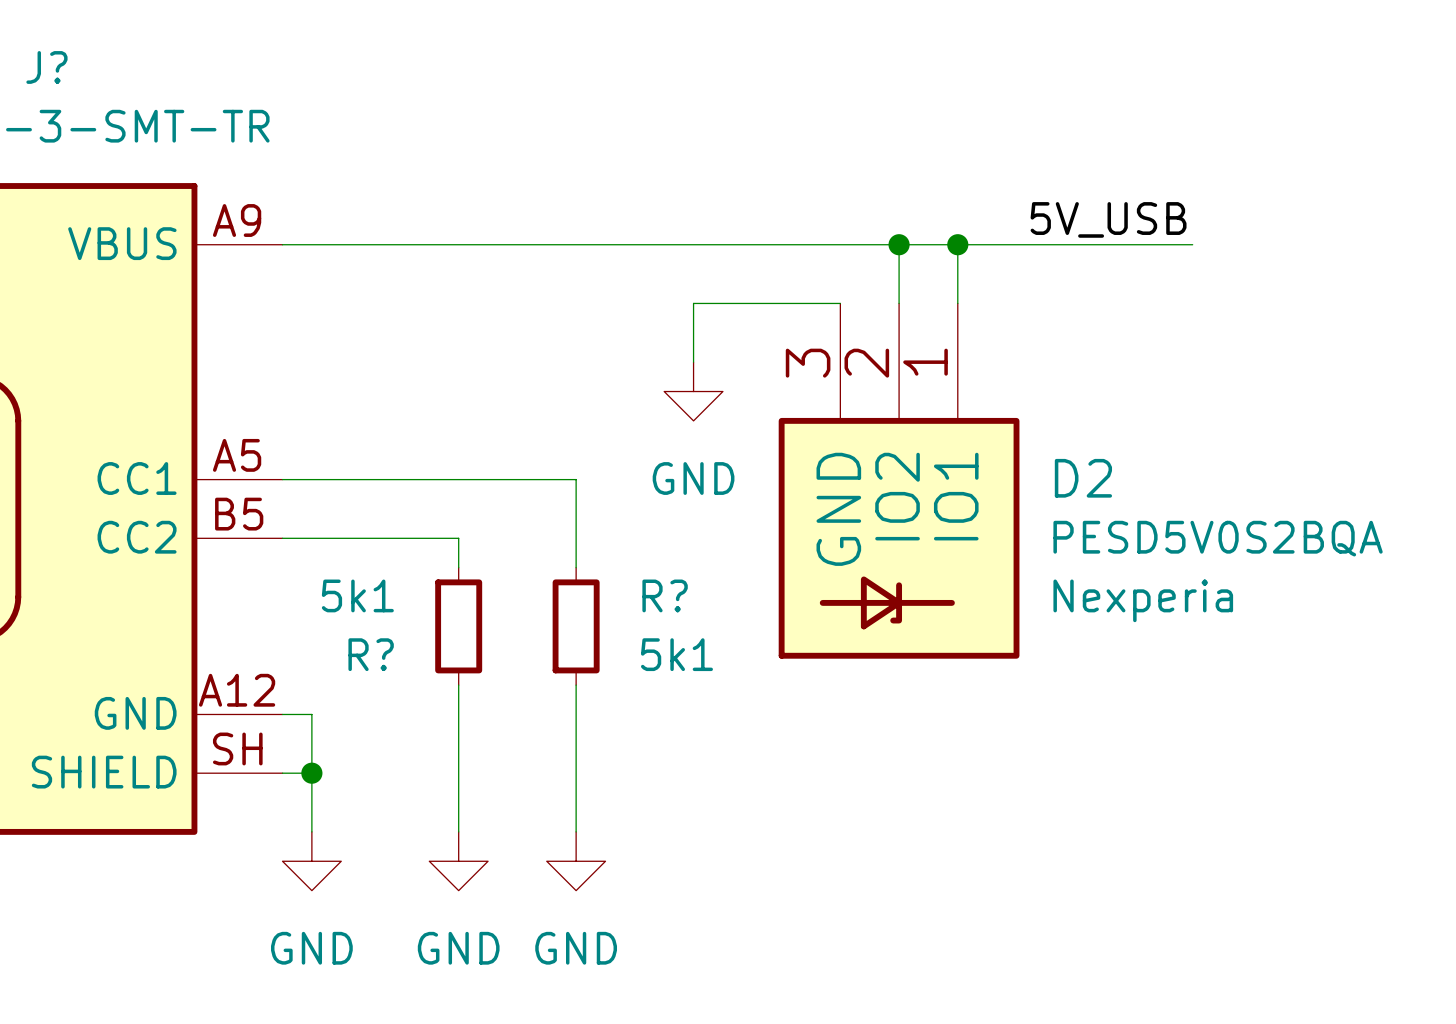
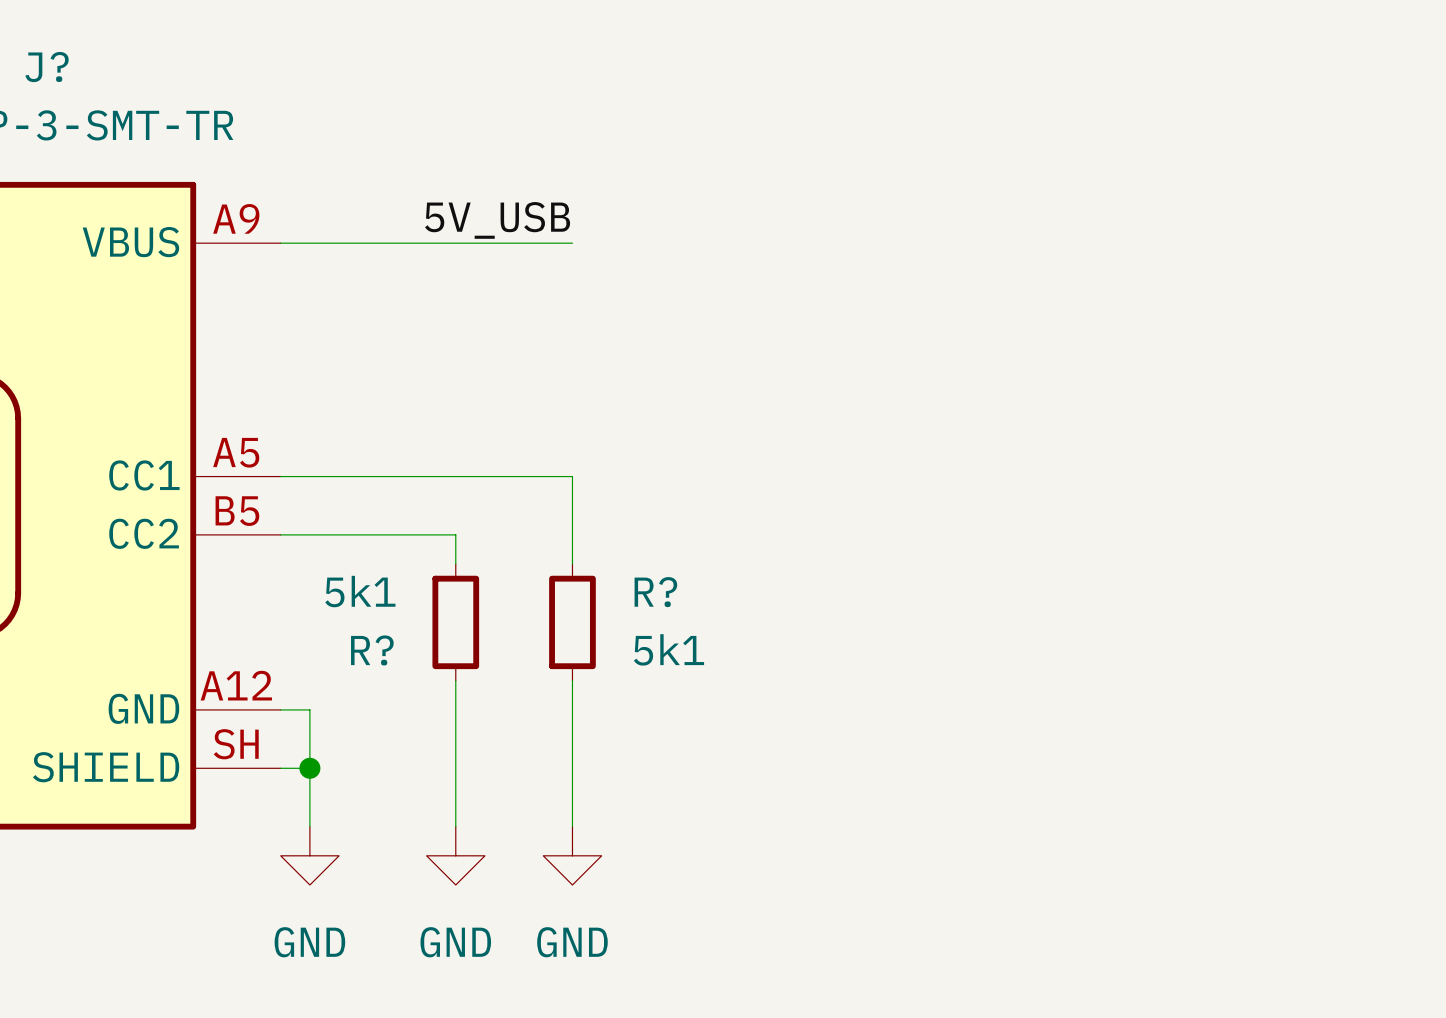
label: none -> 5V_USB (497, 220)
label: 5V_USB (1108, 219) -> none
wire: (576, 244) (1192, 244) -> none
wire: (899, 244) (899, 303) -> none
junction: (899, 244) -> none
wire: (957, 244) (957, 303) -> none
junction: (957, 244) -> none
wire: (840, 303) (693, 303) (693, 362) -> none
power symbol: GND (693, 391) -> none
D2: (899, 481) -> none

